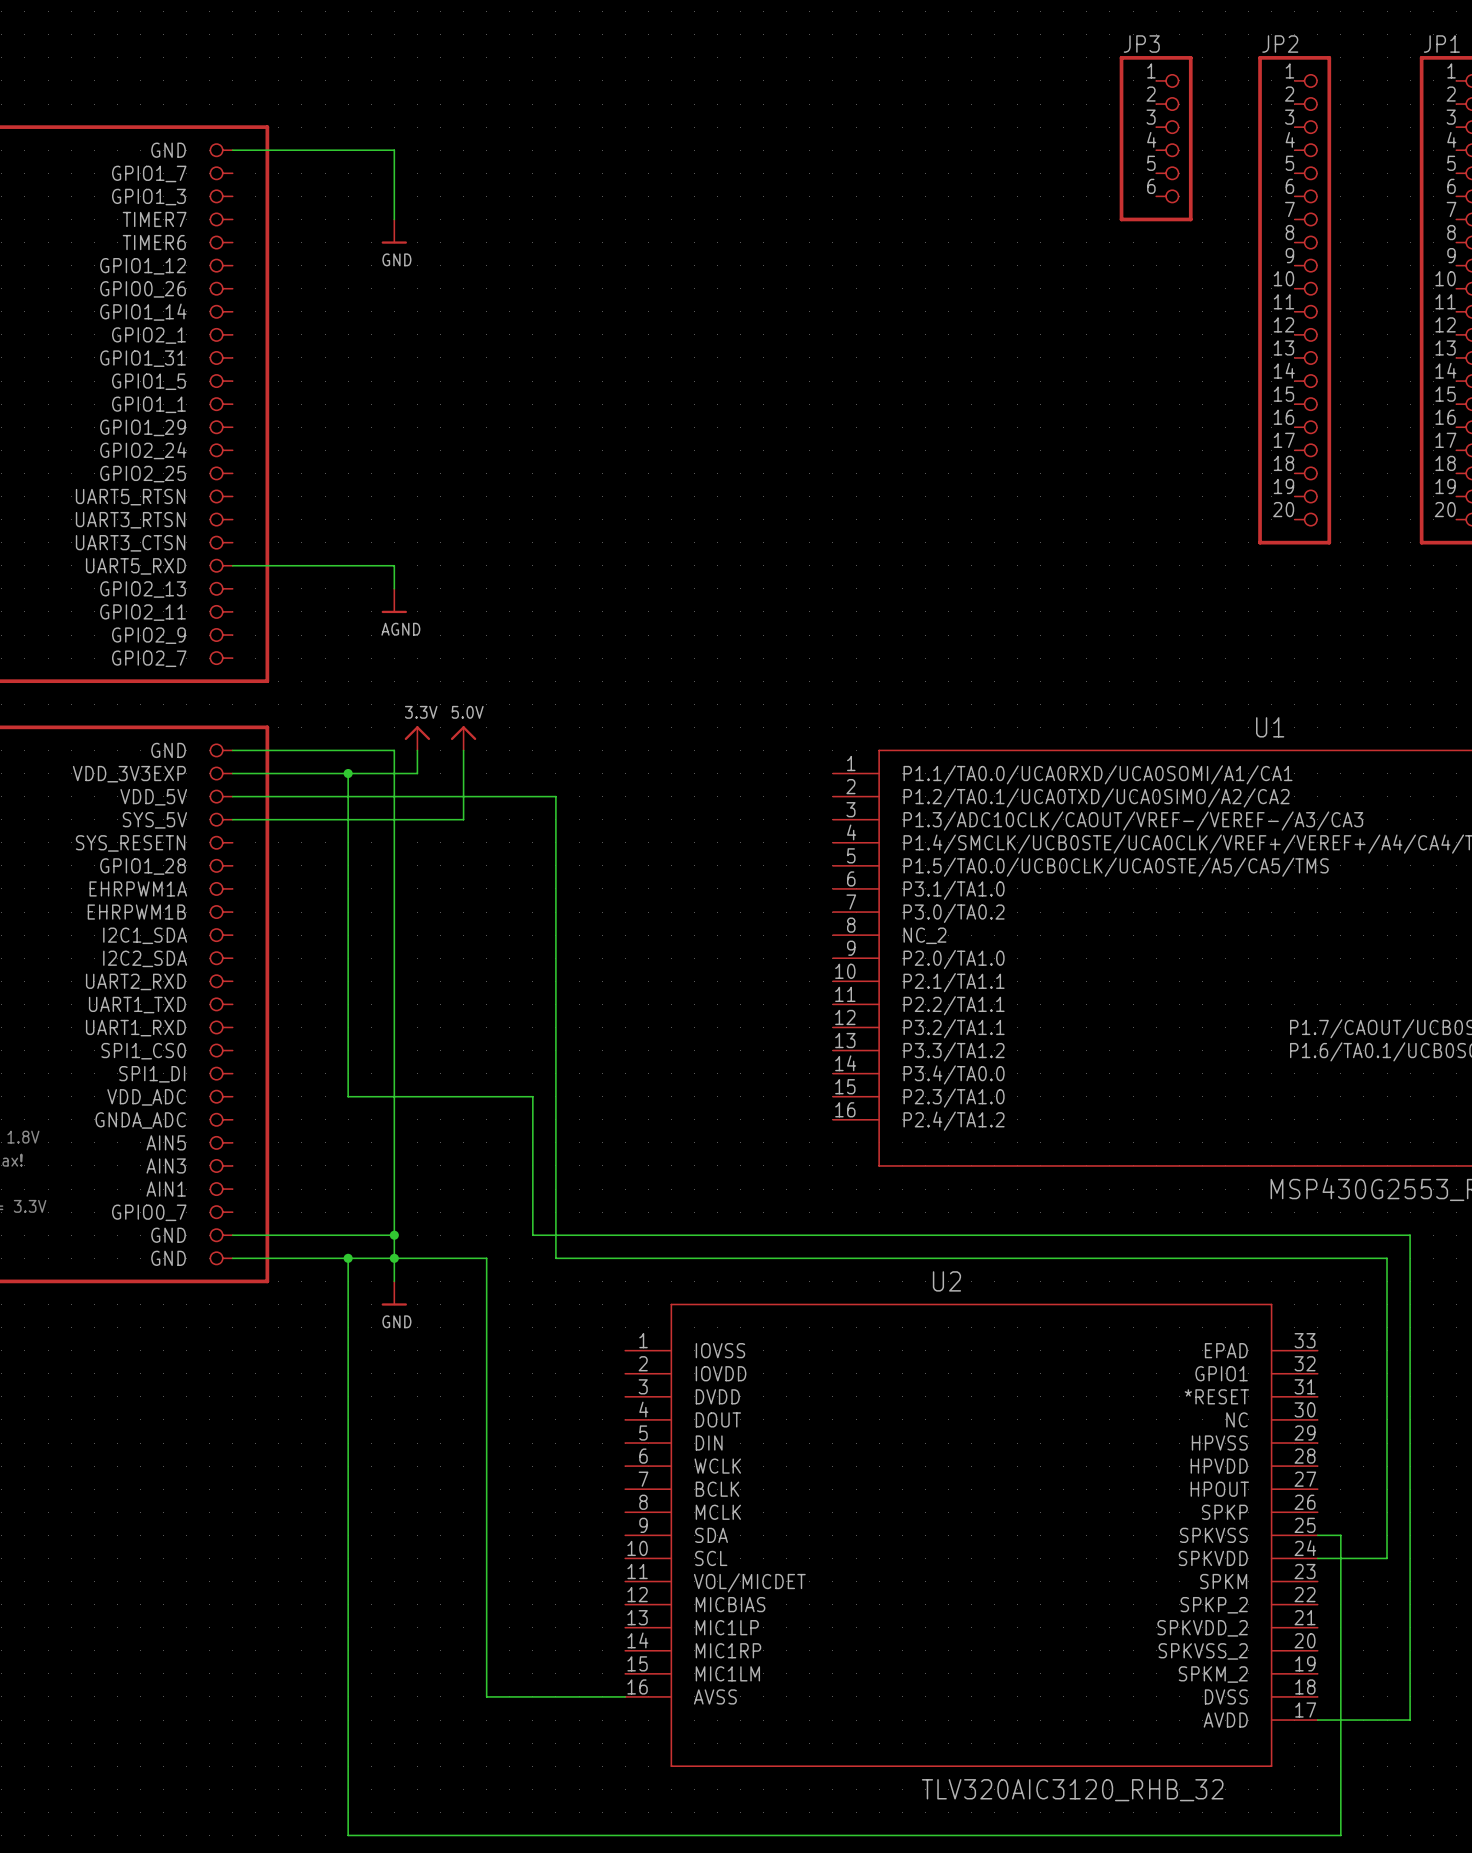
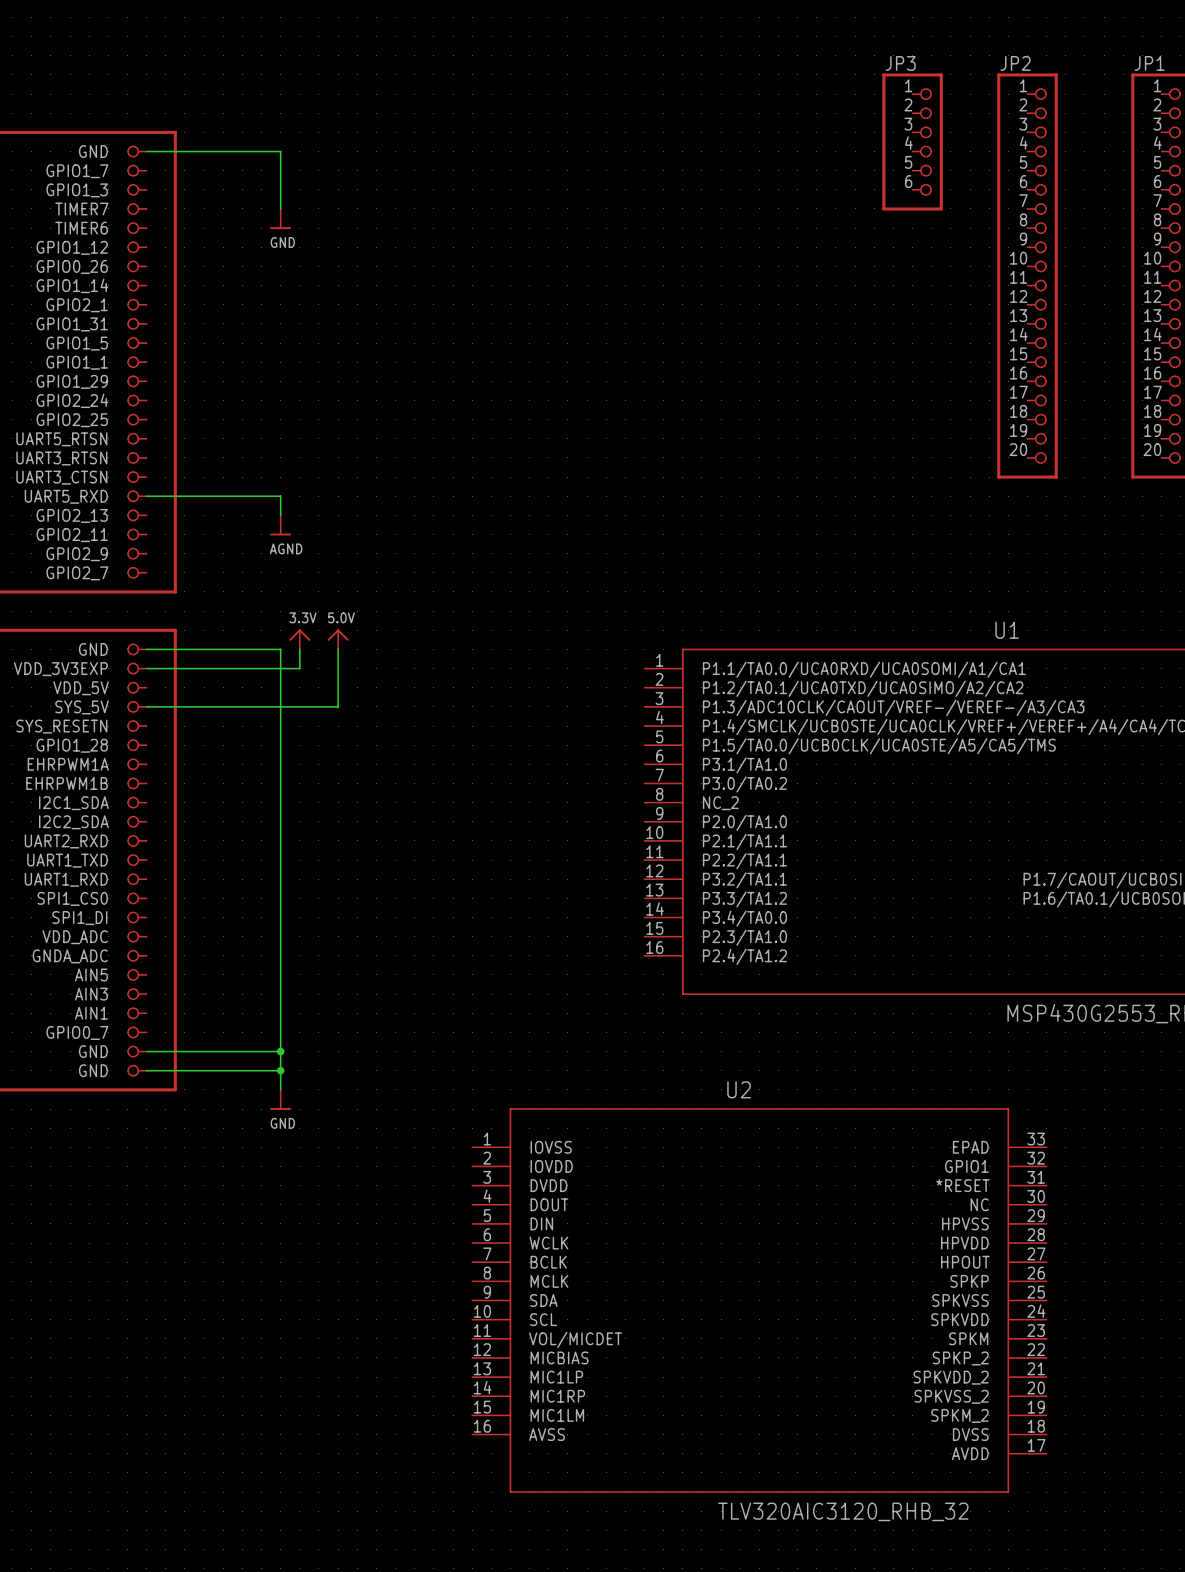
wire: (348, 773) (348, 1096) (532, 1096) (532, 1235) (1410, 1235) (1410, 1720) (1317, 1720) -> none
junction: (348, 773) -> none
wire: (232, 796) (555, 796) (555, 1258) (1387, 1258) (1387, 1558) (1317, 1558) -> none
wire: (348, 1258) (348, 1835) (1340, 1835) (1340, 1535) (1317, 1535) -> none
junction: (348, 1258) -> none
wire: (394, 1258) (486, 1258) (486, 1696) (625, 1696) -> none

